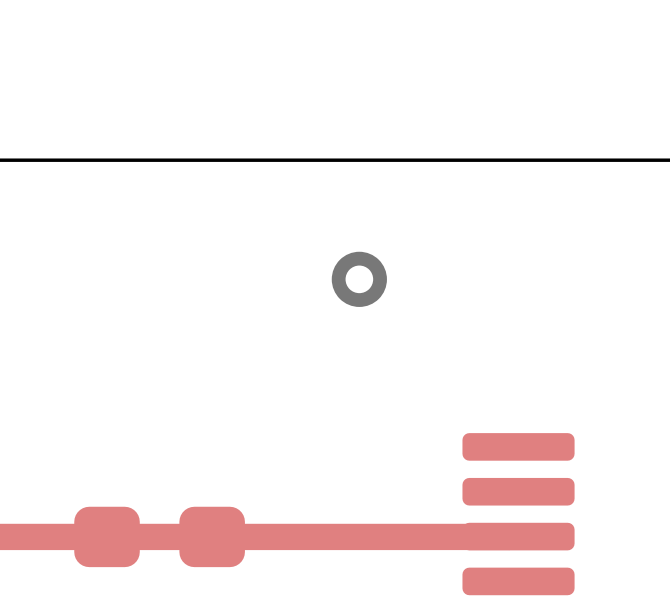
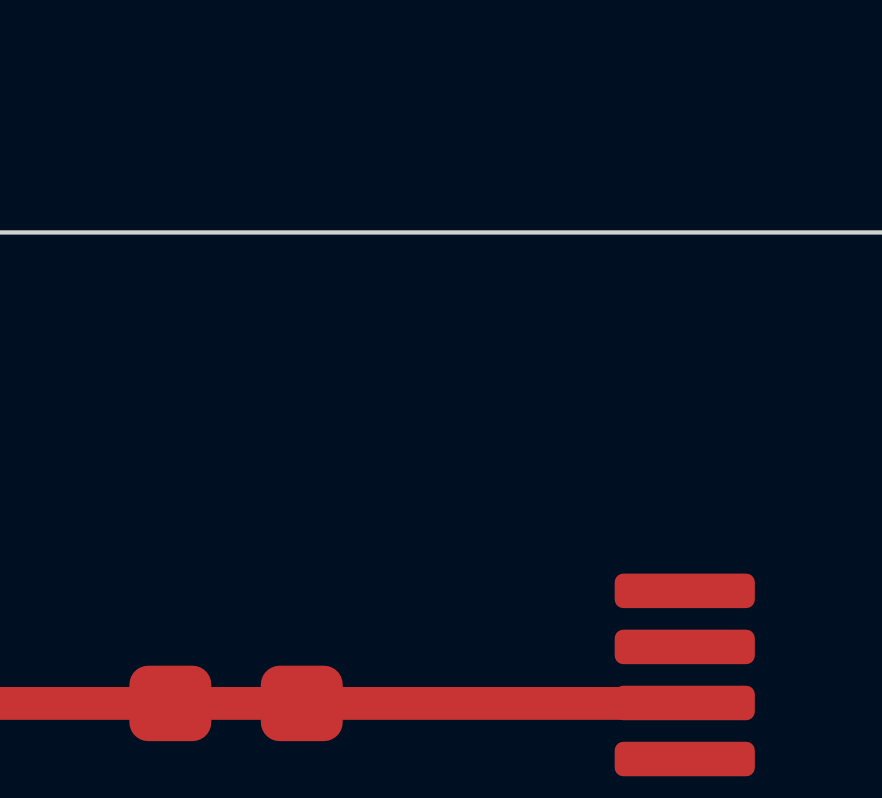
via: (359, 279) -> none

